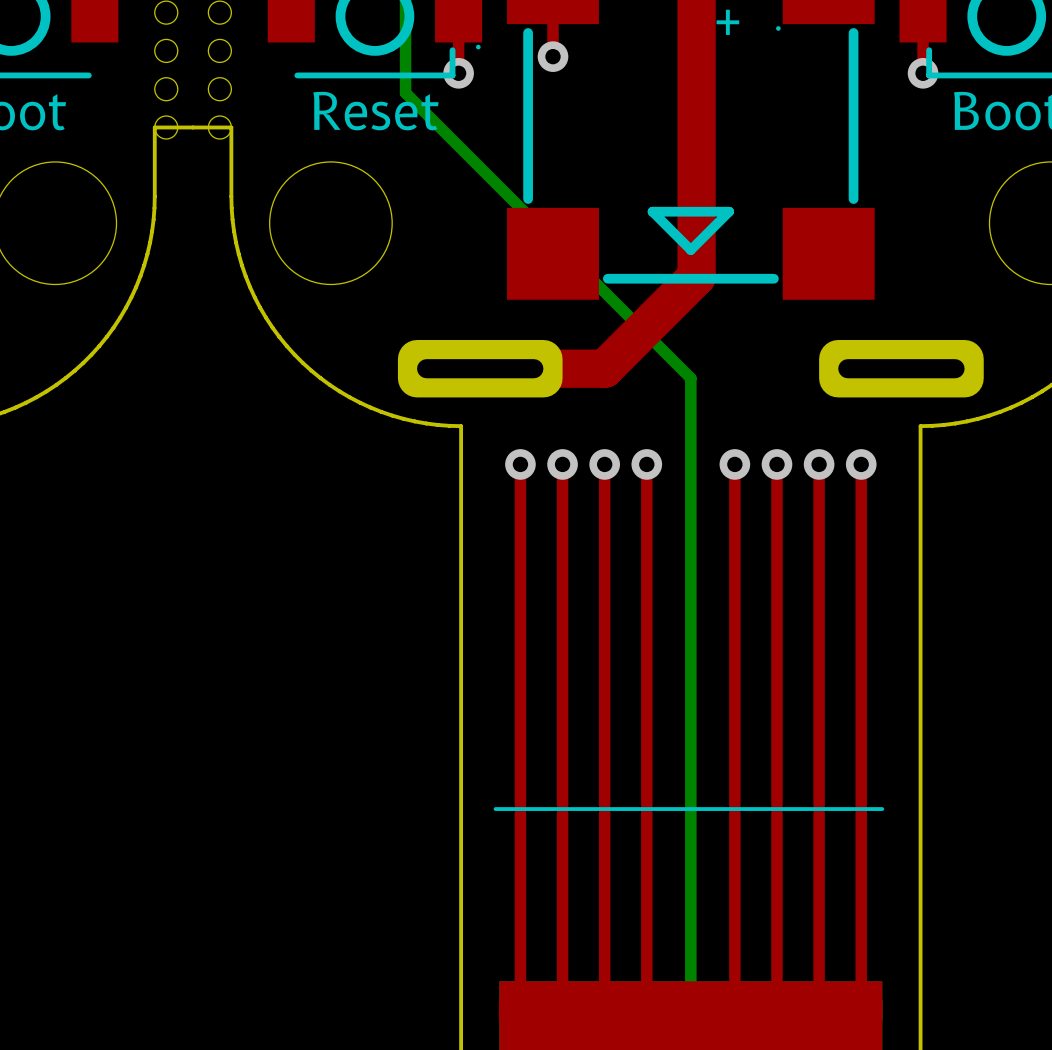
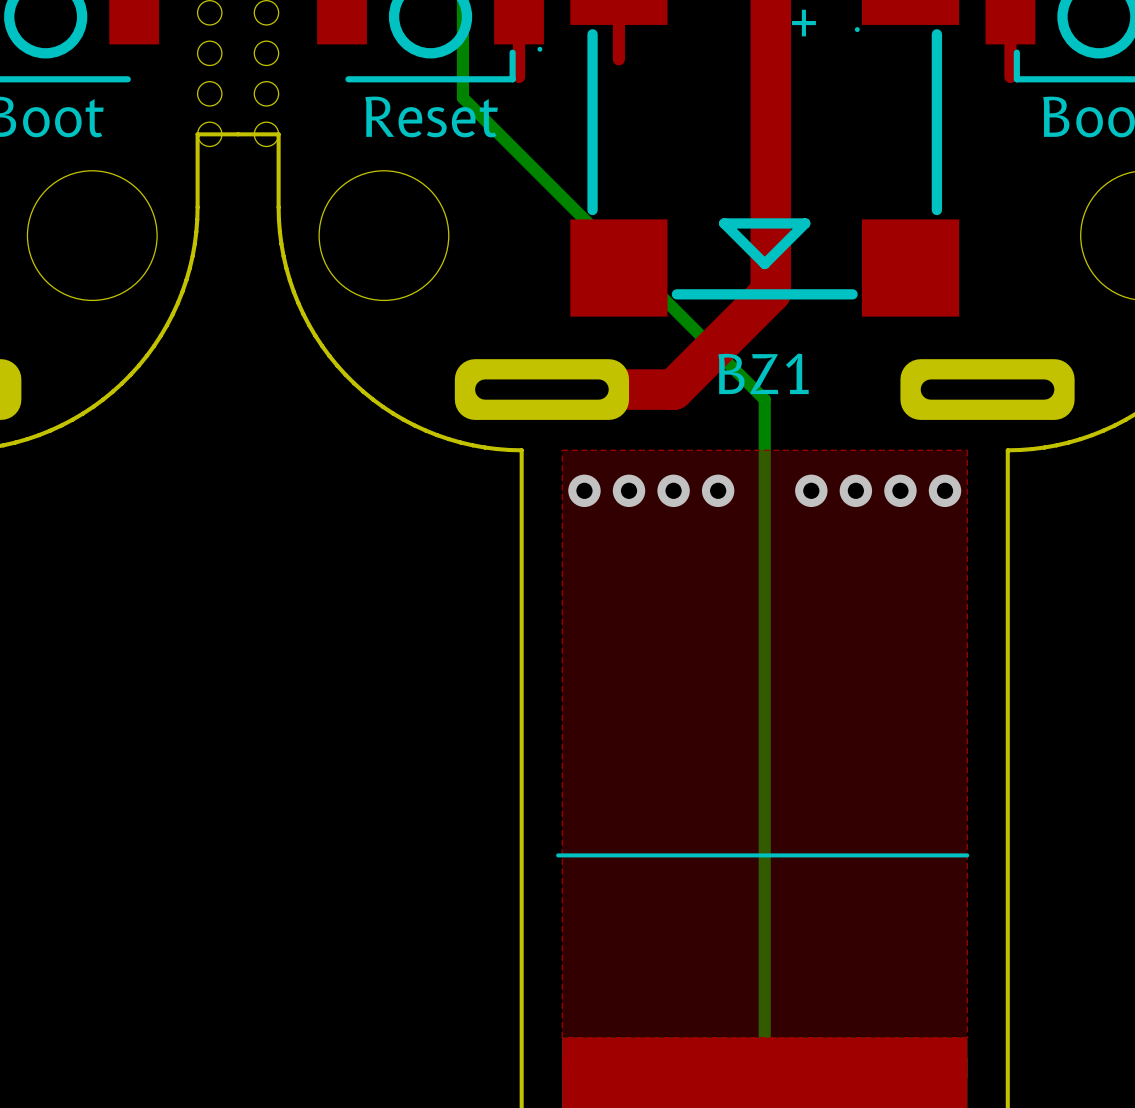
via: (553, 56) -> none
via: (458, 73) -> none
via: (923, 73) -> none
BZ1 name: none -> BZ1 (763, 373)
top zone outline: none -> (562, 450) (967, 450) (967, 1037) (562, 1037) (562, 450)
top track: (520, 464) (520, 1000) -> none
top track: (562, 464) (562, 1000) -> none
top track: (604, 464) (604, 1000) -> none
top track: (646, 464) (646, 1000) -> none
top track: (734, 464) (734, 1000) -> none
top track: (776, 464) (776, 1000) -> none
top track: (819, 464) (819, 1000) -> none
top track: (861, 464) (861, 1000) -> none

